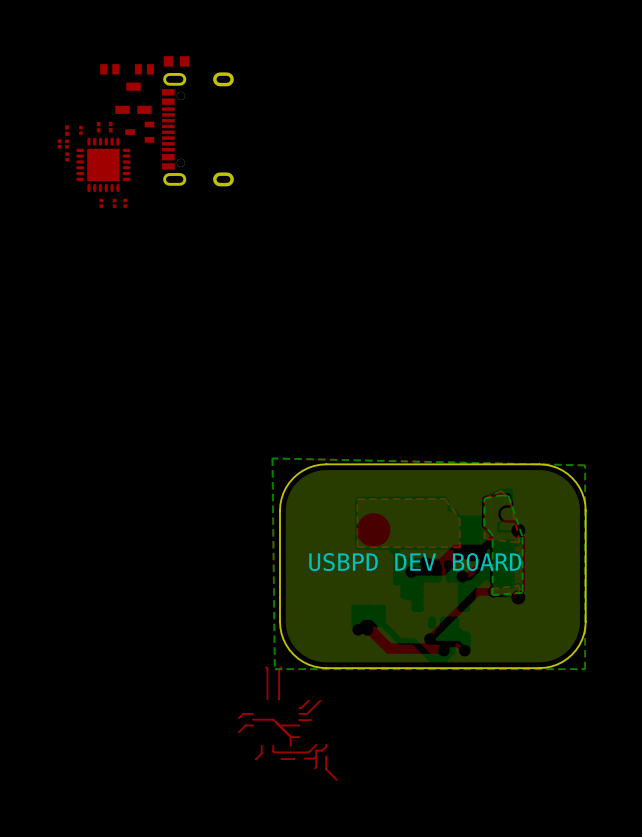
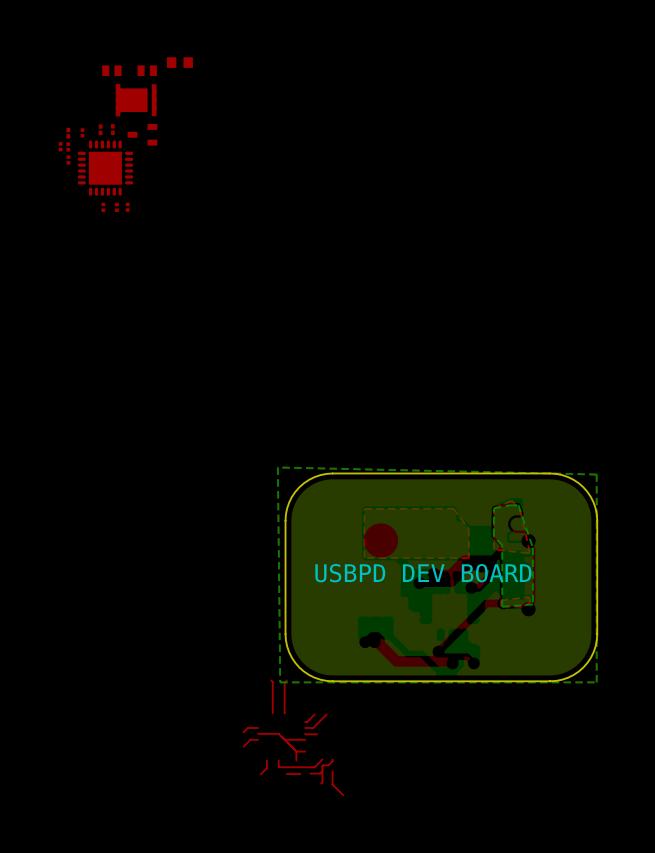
part footprint: [115, 82, 152, 114] -> [115, 83, 157, 117]
part: (197, 129) -> none

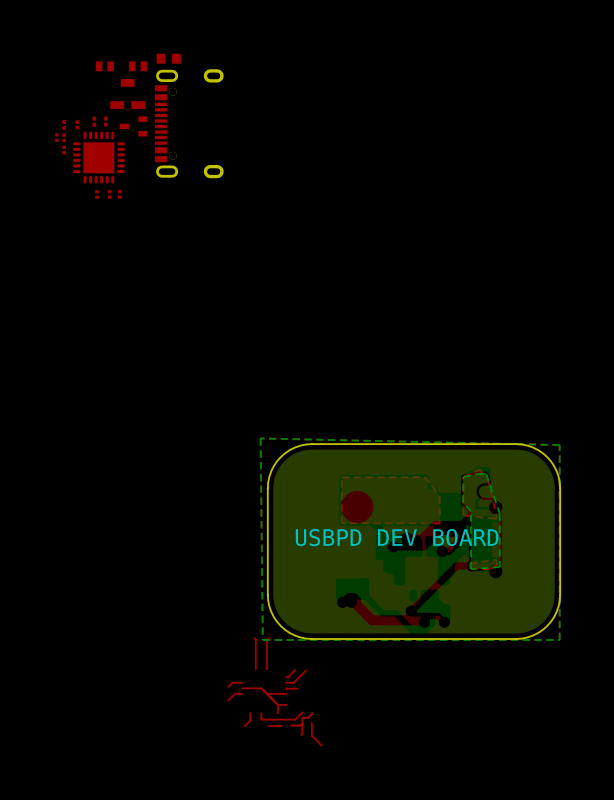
part footprint: [115, 83, 157, 117] -> [110, 79, 146, 109]
part: none -> (189, 123)

